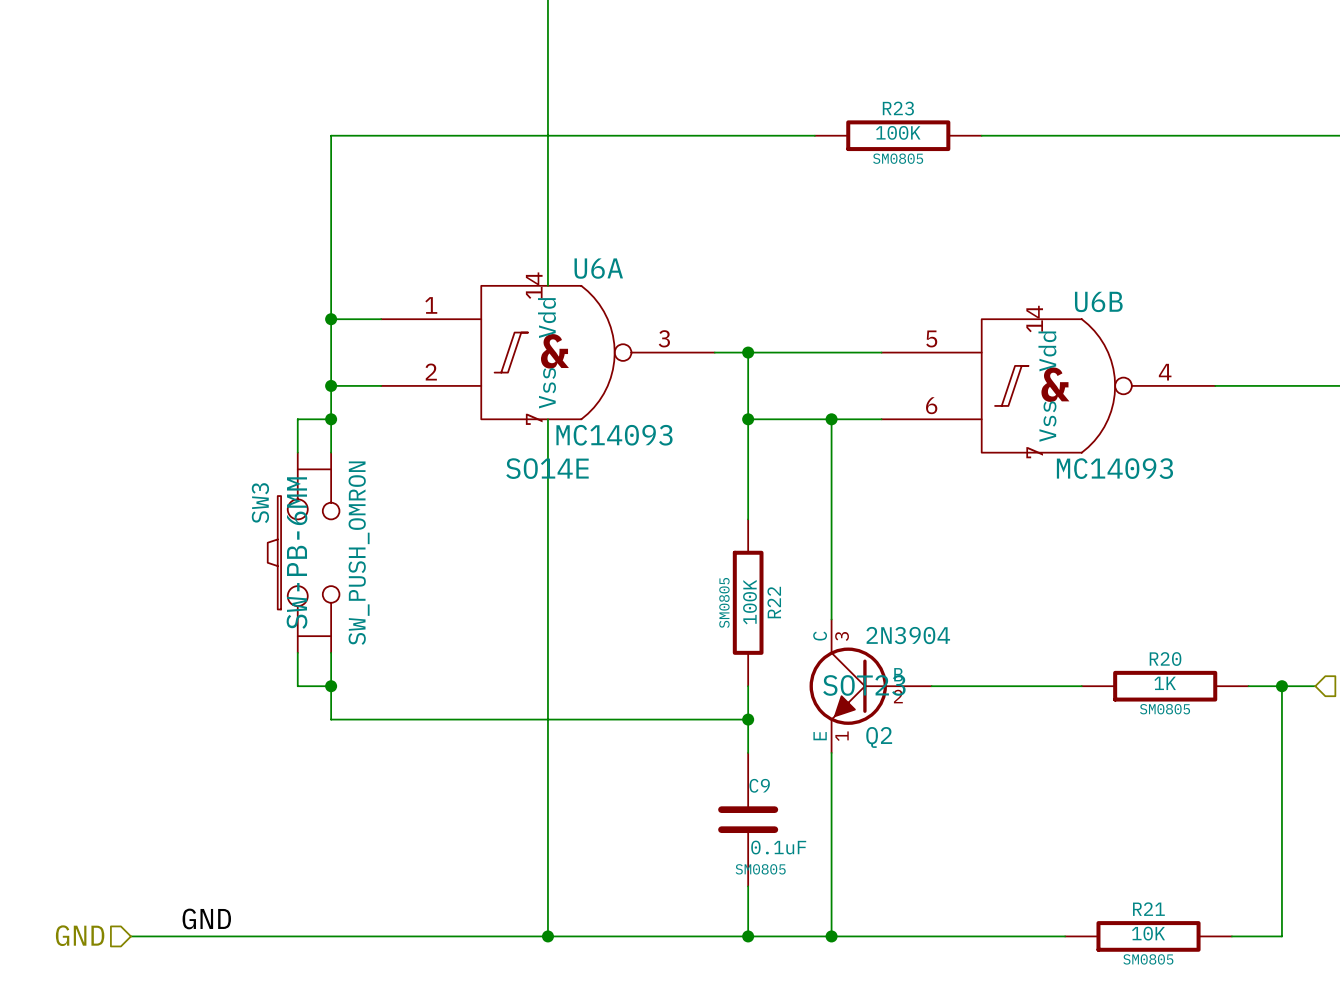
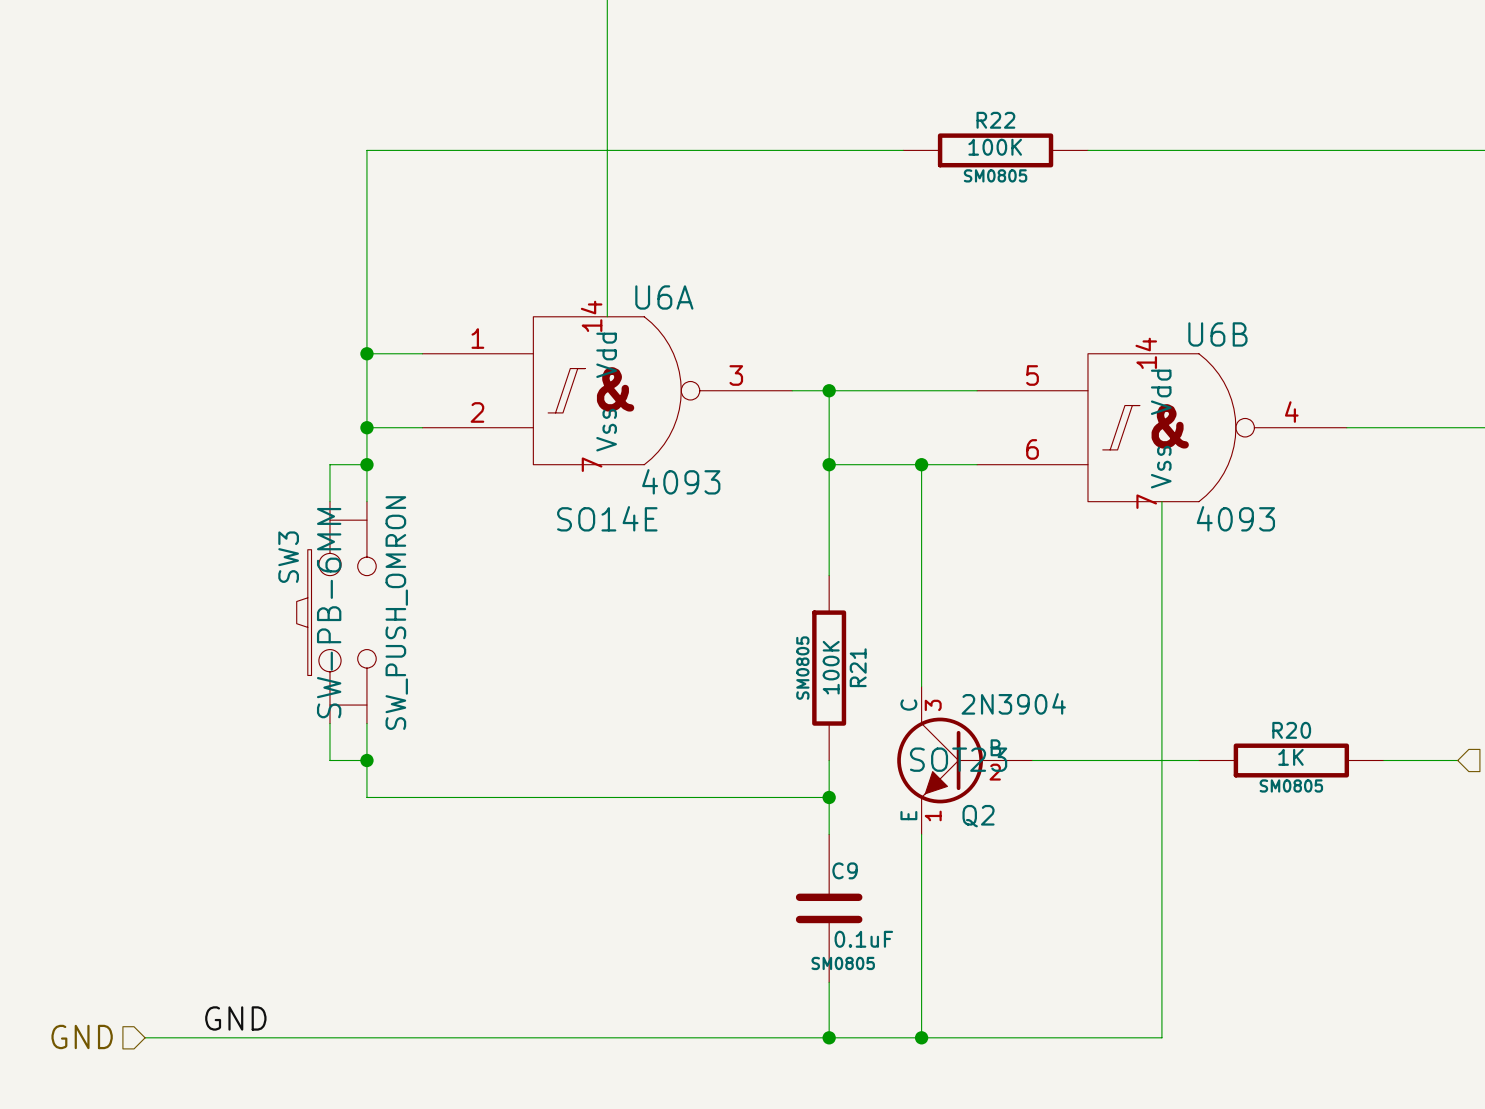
R23 name: R23 (898, 108) -> R22 (995, 120)
wire: (547, 419) (547, 936) -> none
U6A value: MC14093 (614, 435) -> 4093 (681, 481)
U6B value: MC14093 (1114, 468) -> 4093 (1235, 518)
R22 name: R22 (774, 602) -> R21 (858, 667)
wire: (1281, 686) (1281, 936) (1231, 936) -> none
junction: (1281, 686) -> none
junction: (547, 936) -> none
wire: (1048, 936) (1065, 936) -> (1161, 1037) (1161, 501)
R21: 10K (1148, 936) -> none

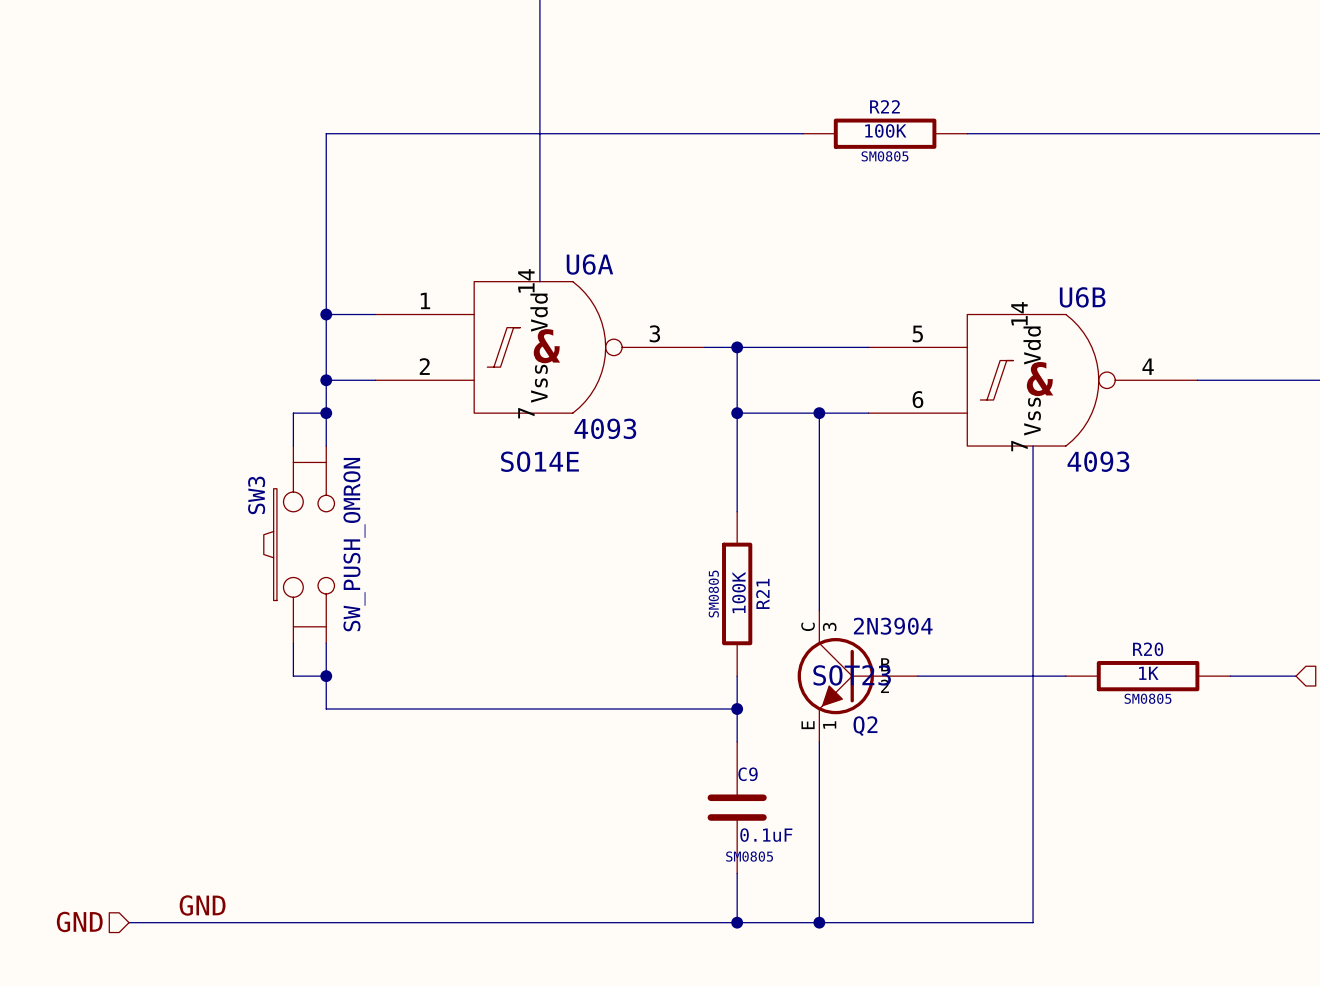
SW3 text: SW-PB-6MM (329, 613) -> none

